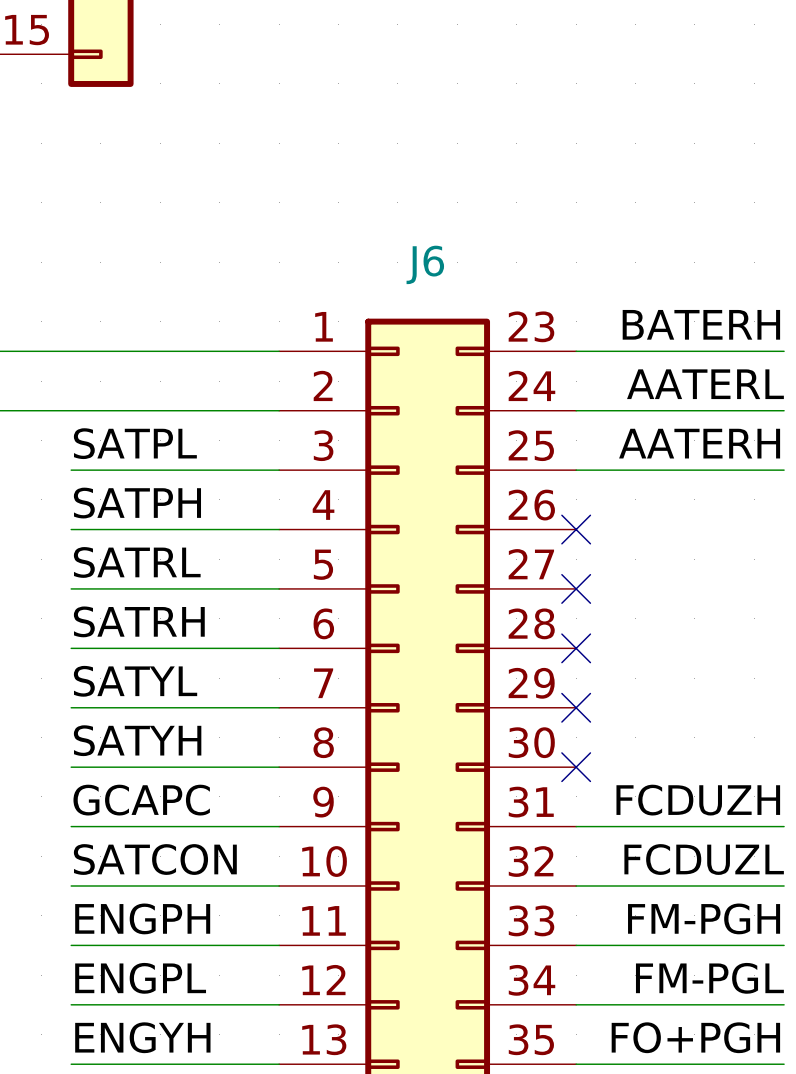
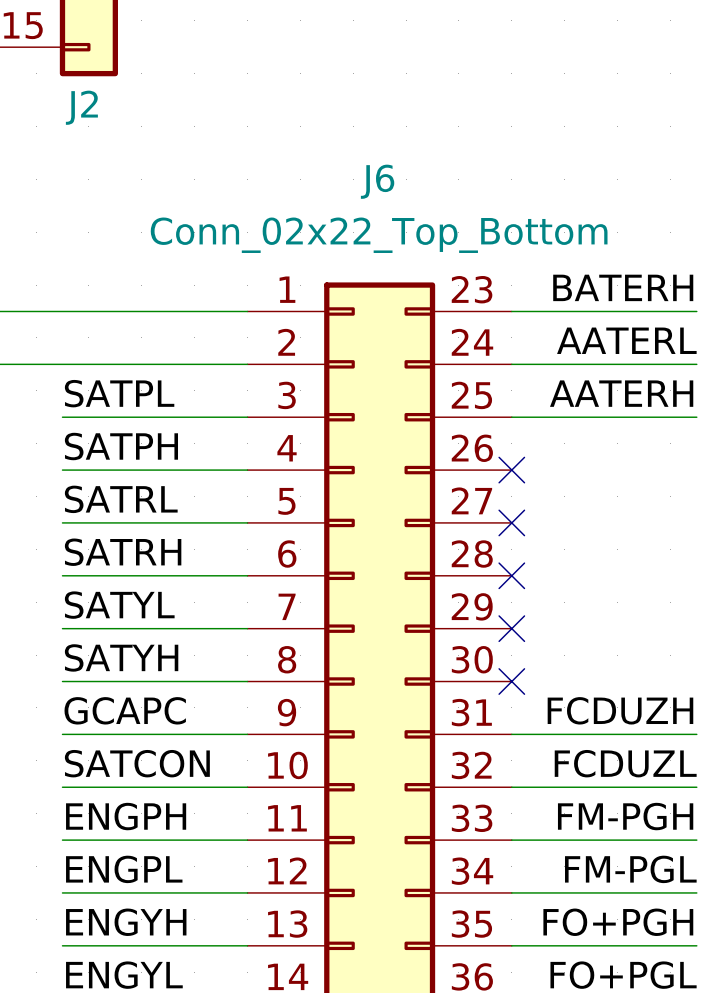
J2 name: none -> J2 (81, 107)
J6 name position: J6 (425, 264) -> J6 (377, 181)
J6 value: none -> Conn_02x22_Top_Bottom (379, 235)

